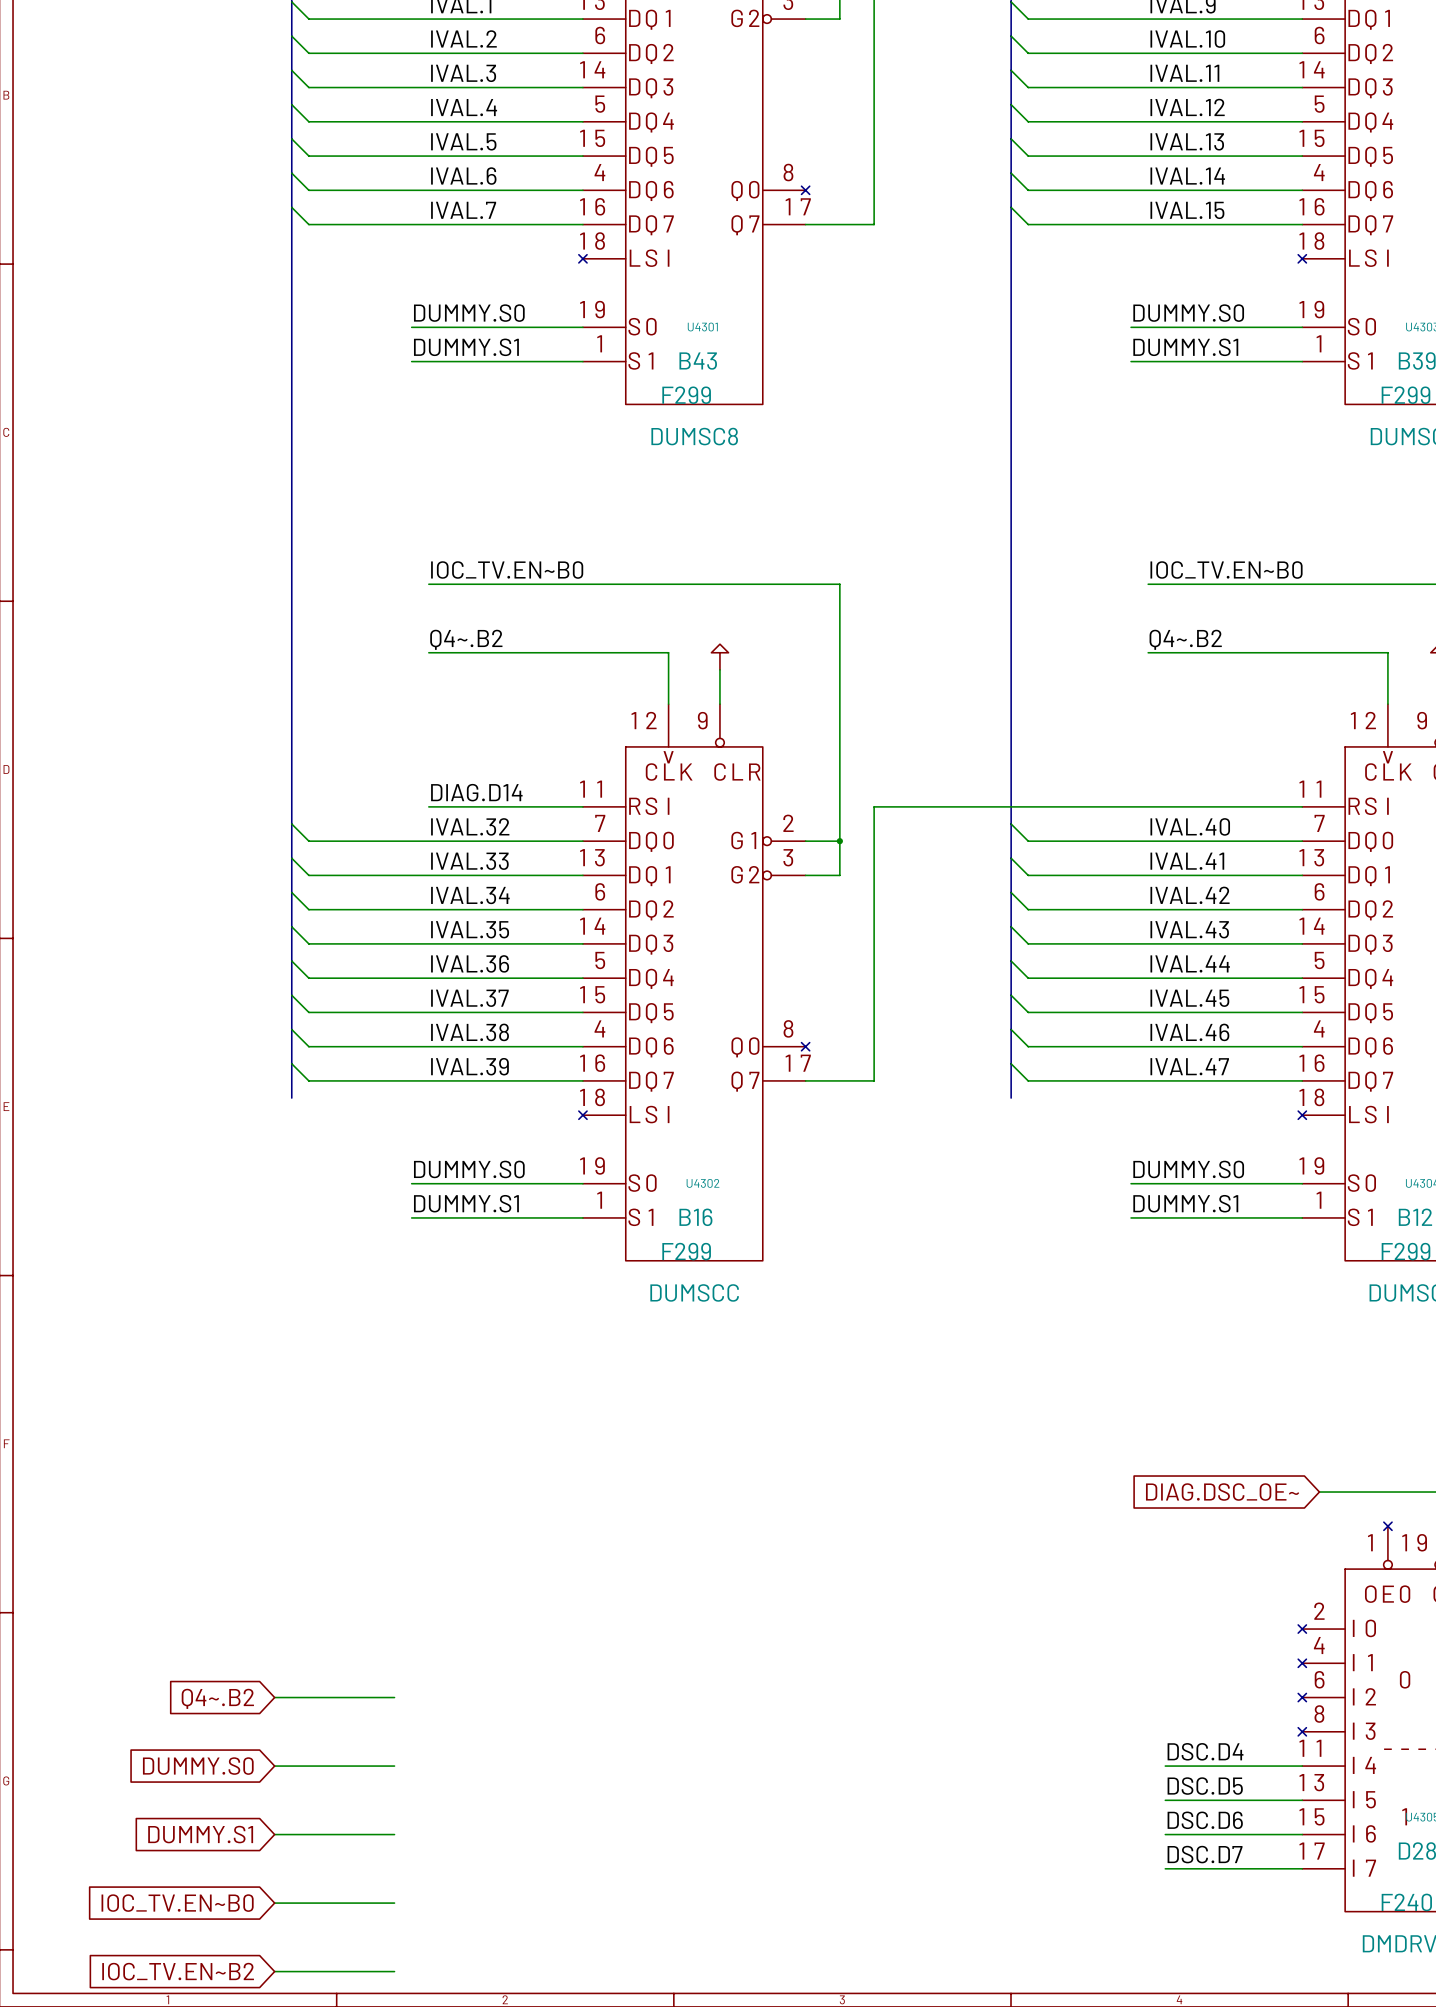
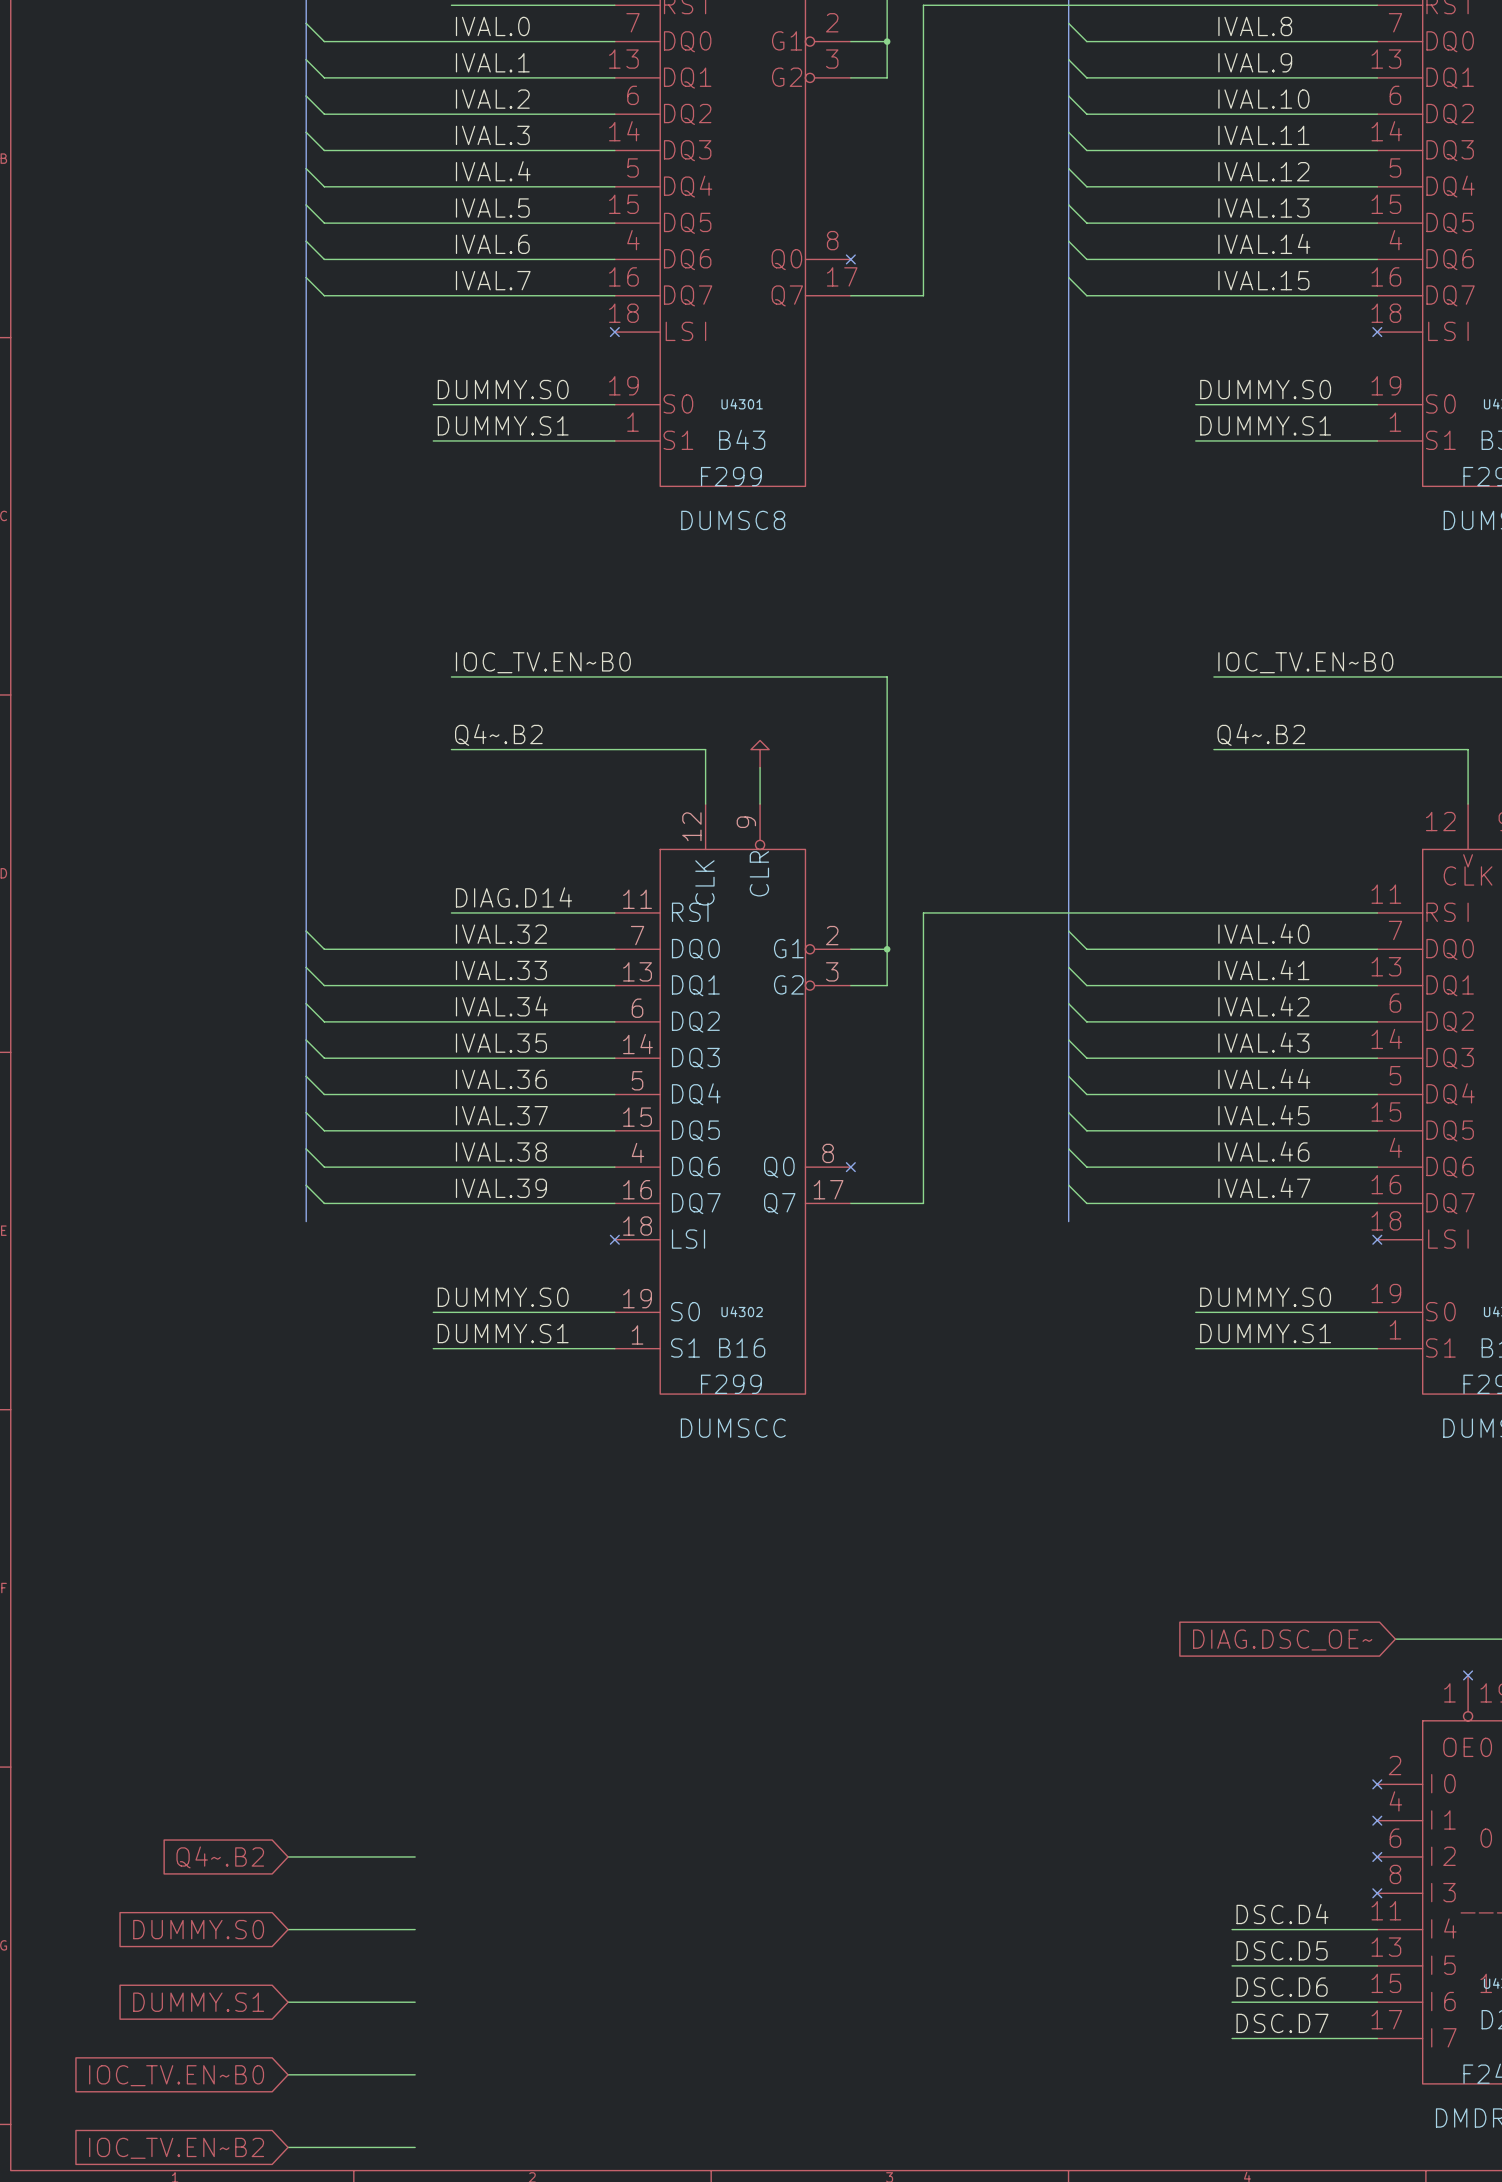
U4302 symbol: [582, 704, 806, 1261] -> [614, 804, 851, 1395]

